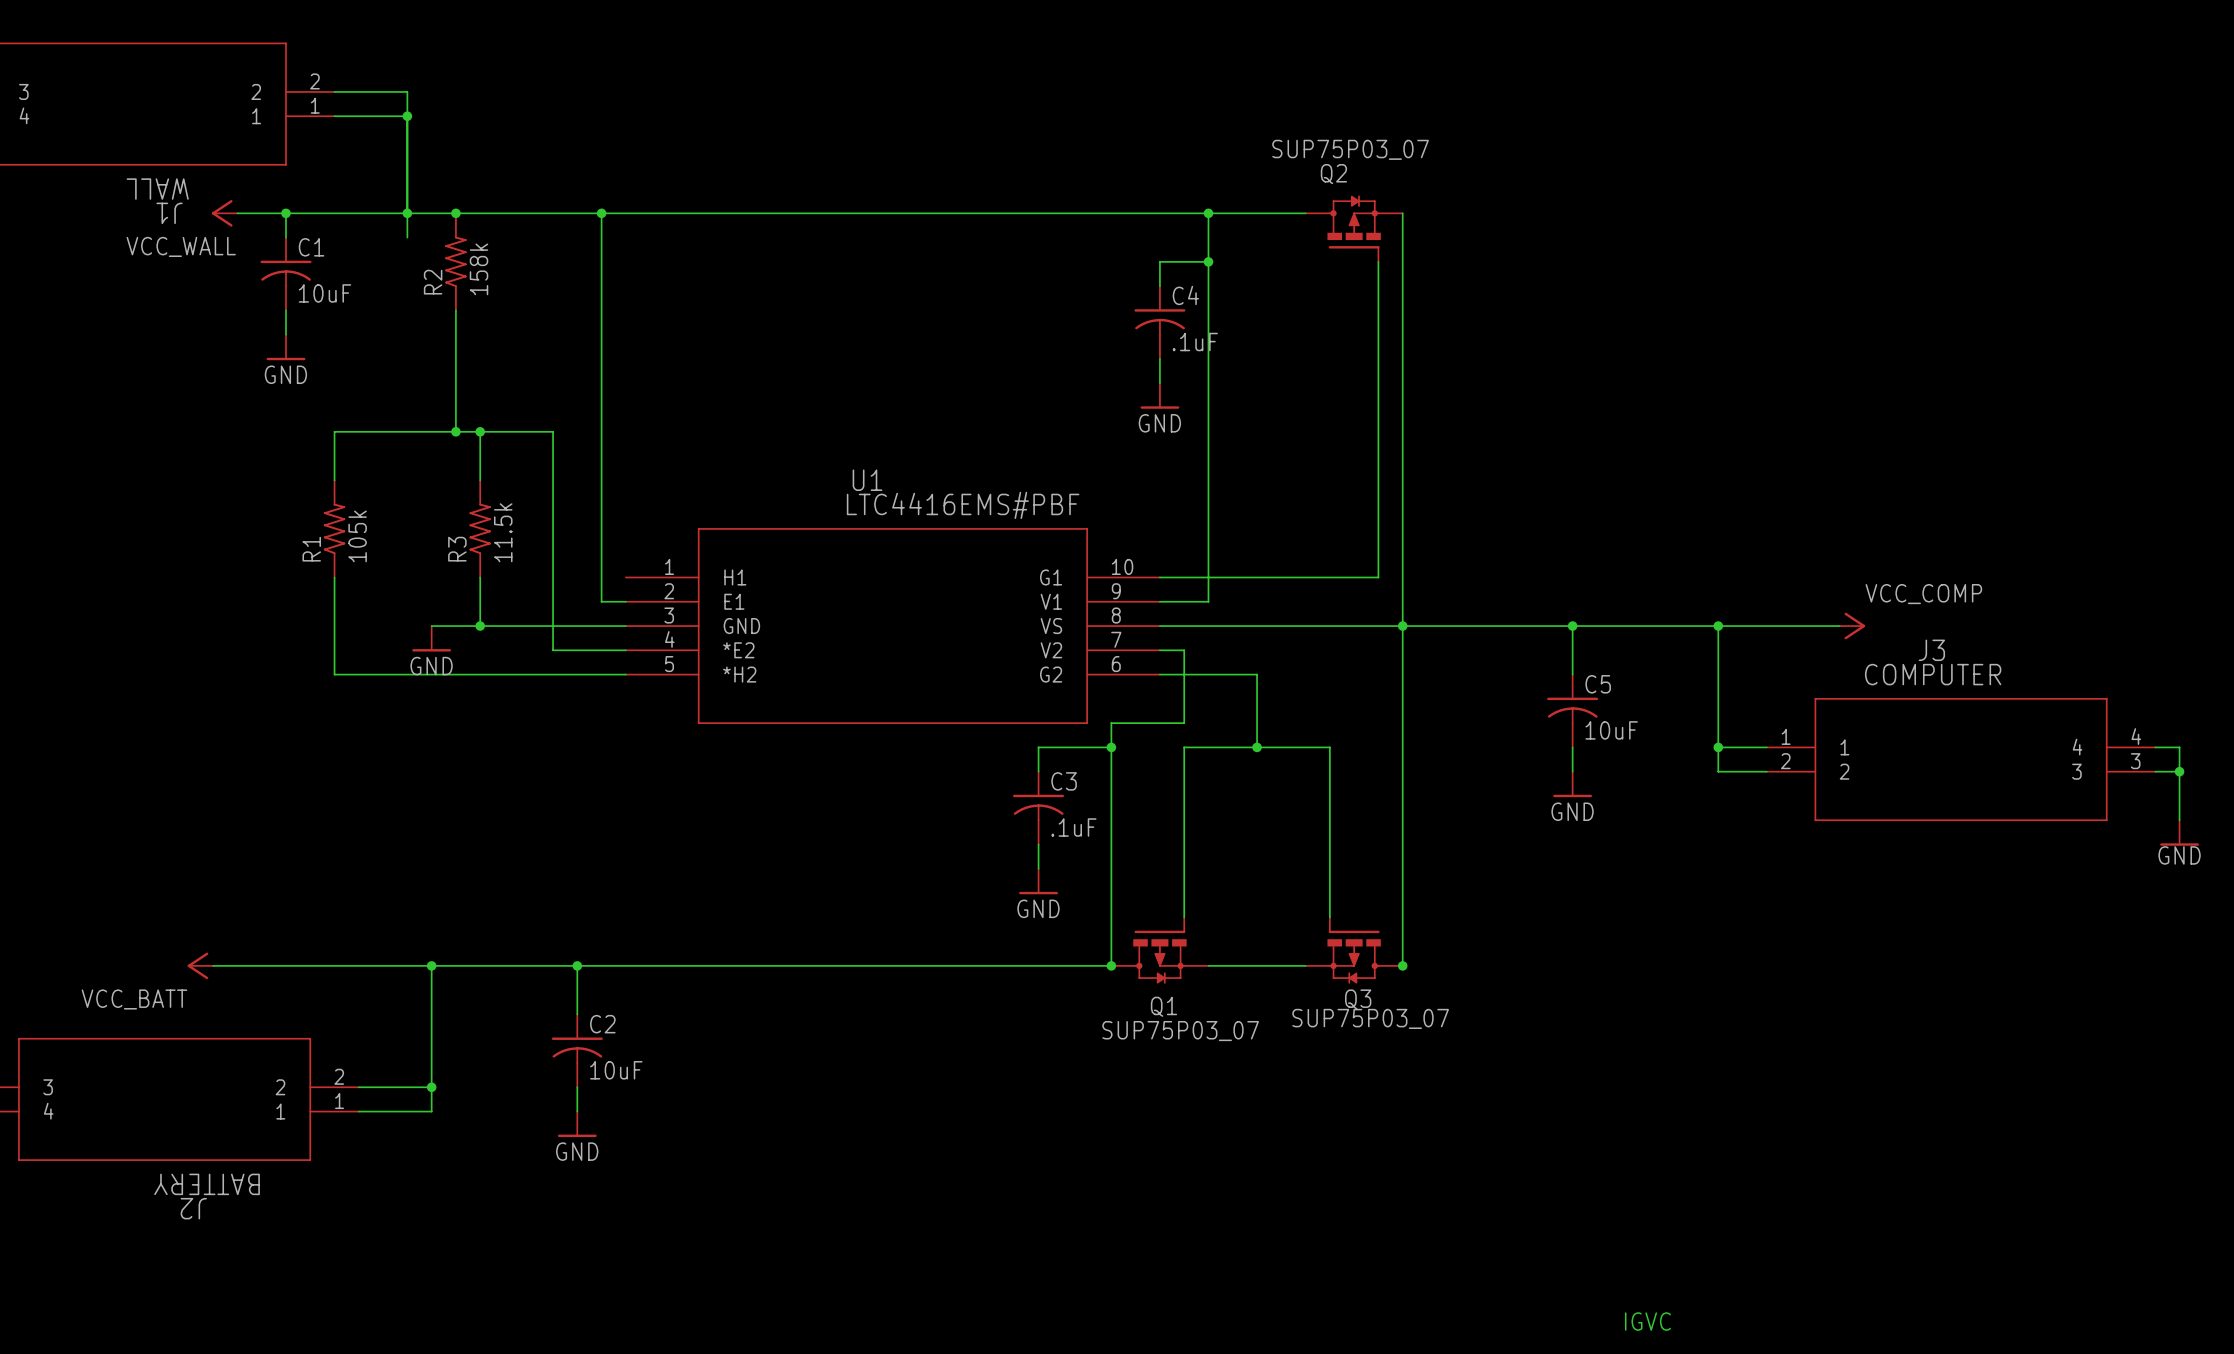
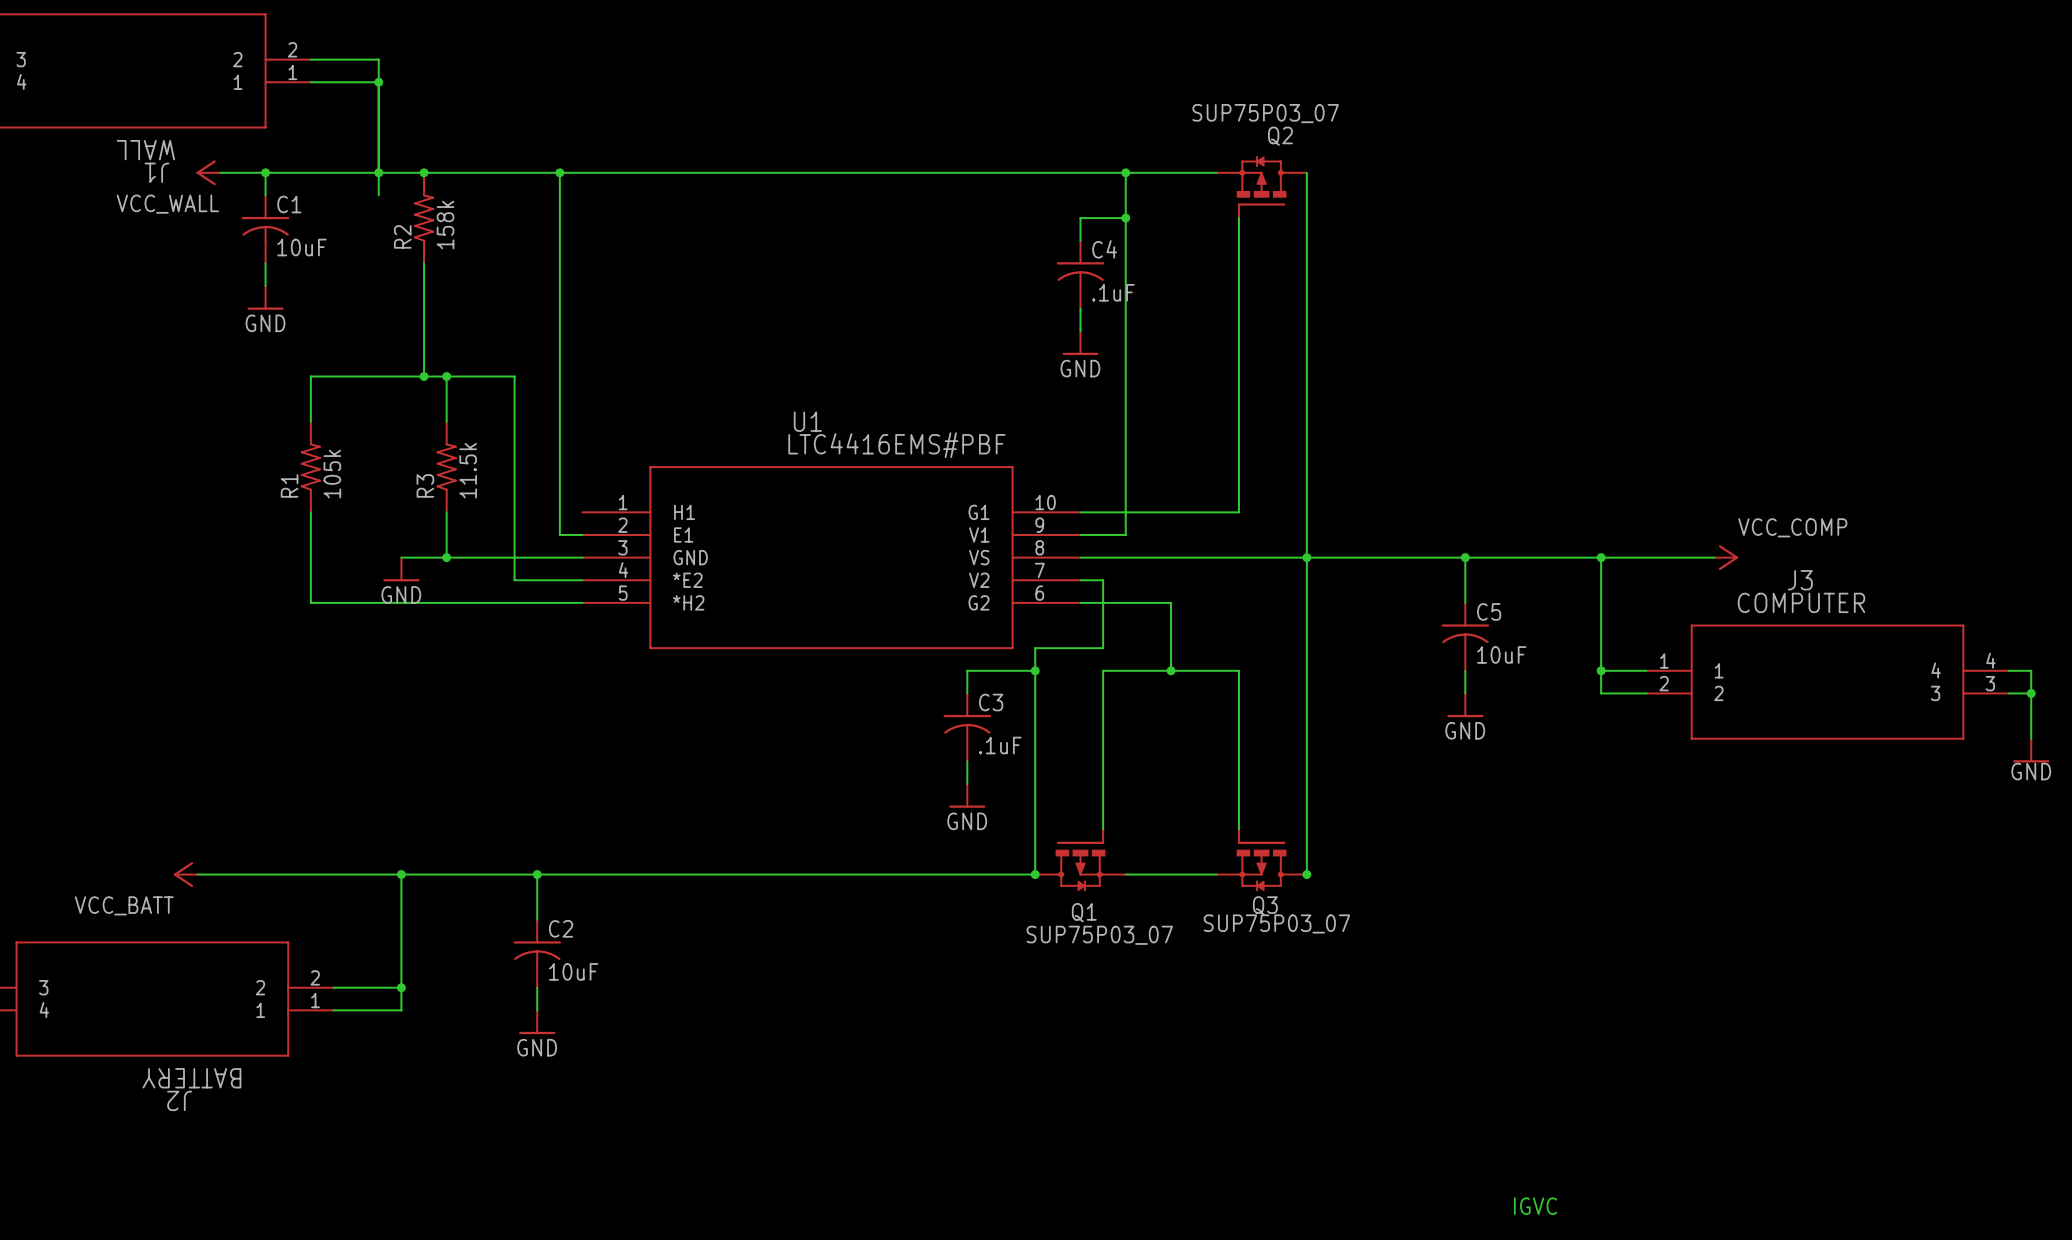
Q2 flip: as is (1354, 229) -> left-right (1261, 187)
wire: (1378, 261) (1378, 577) (1329, 577) -> (1238, 218) (1238, 512)

